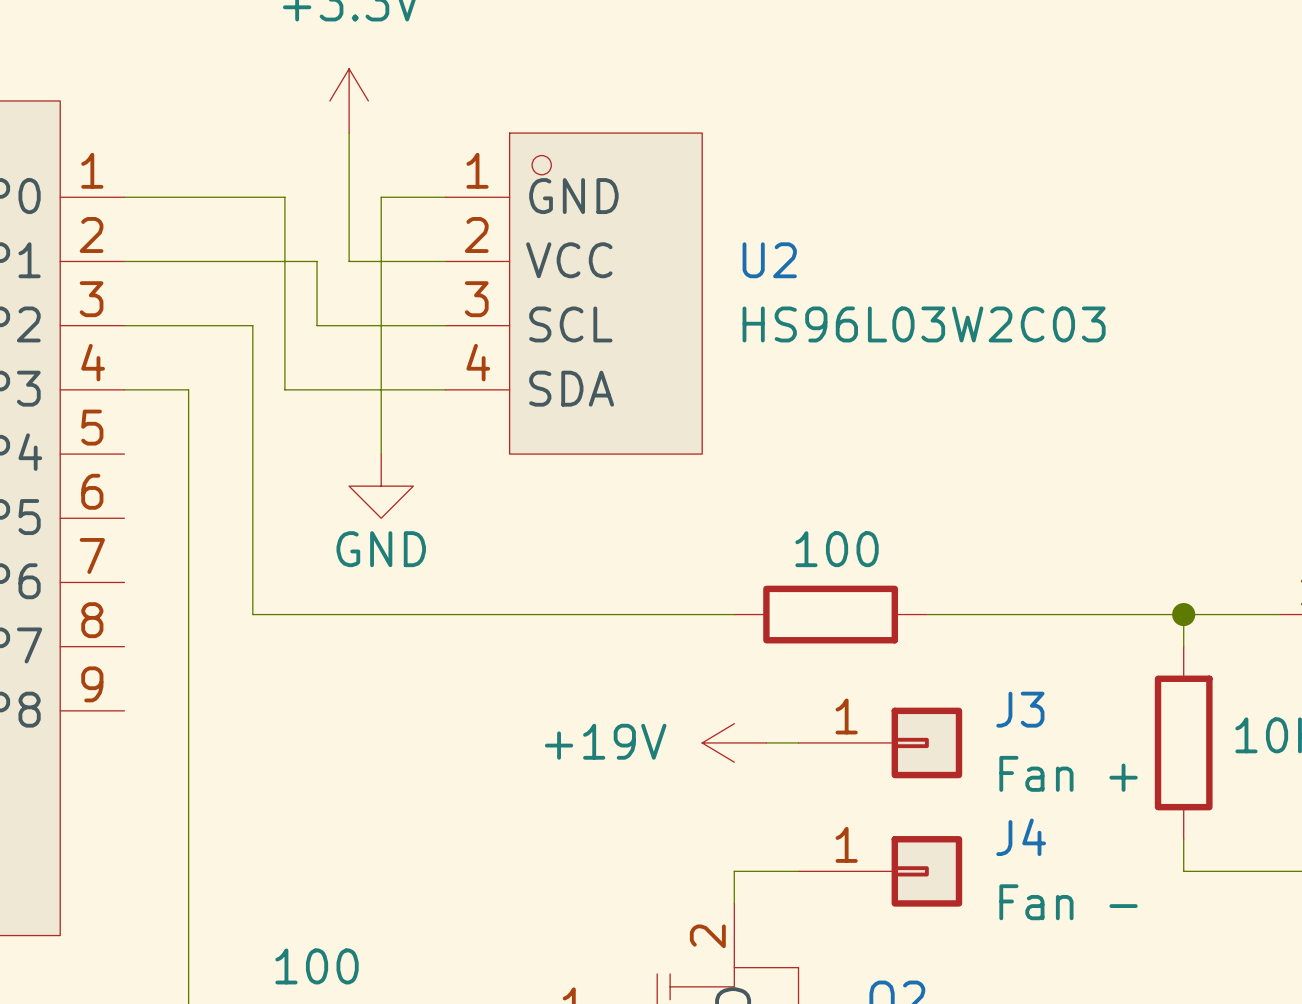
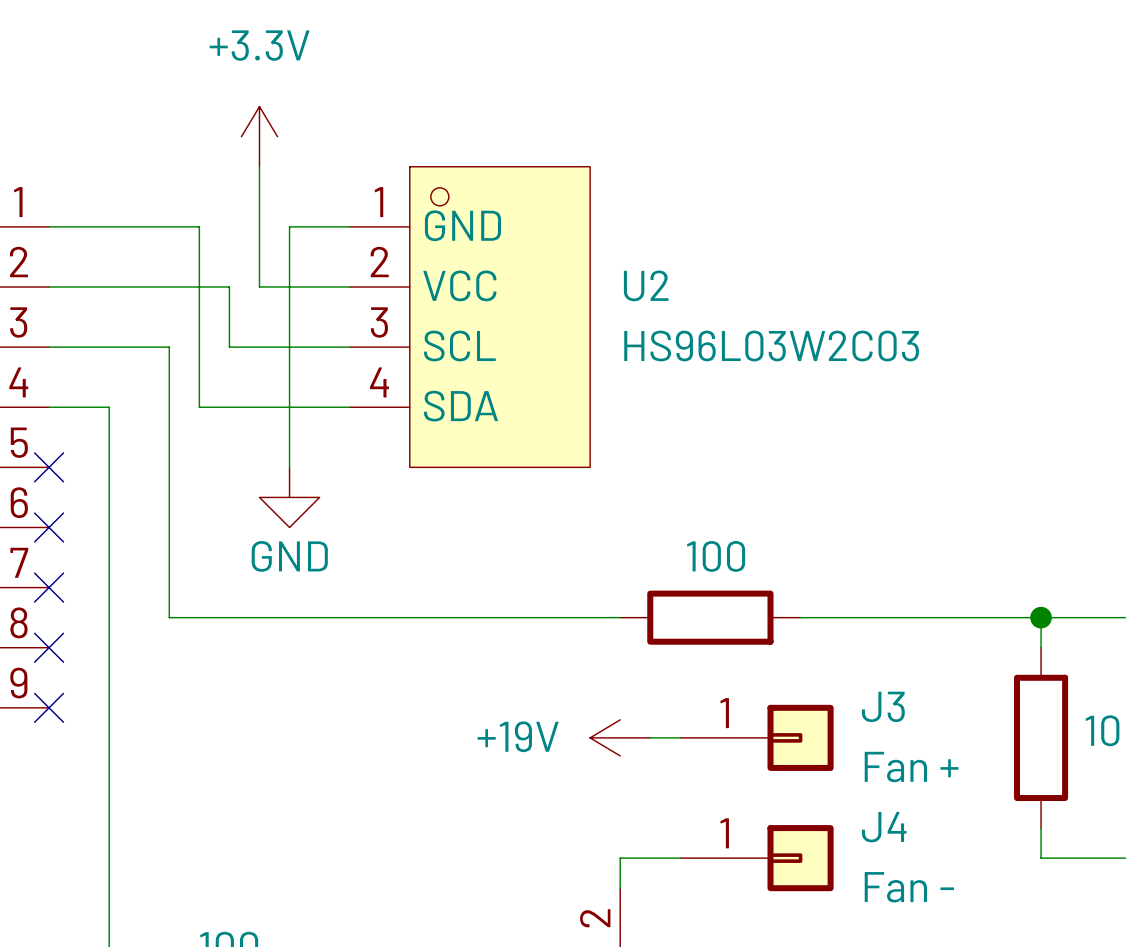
no-connect mark: none -> (49, 467)
no-connect mark: none -> (49, 527)
no-connect mark: none -> (49, 587)
no-connect mark: none -> (49, 647)
no-connect mark: none -> (49, 707)

